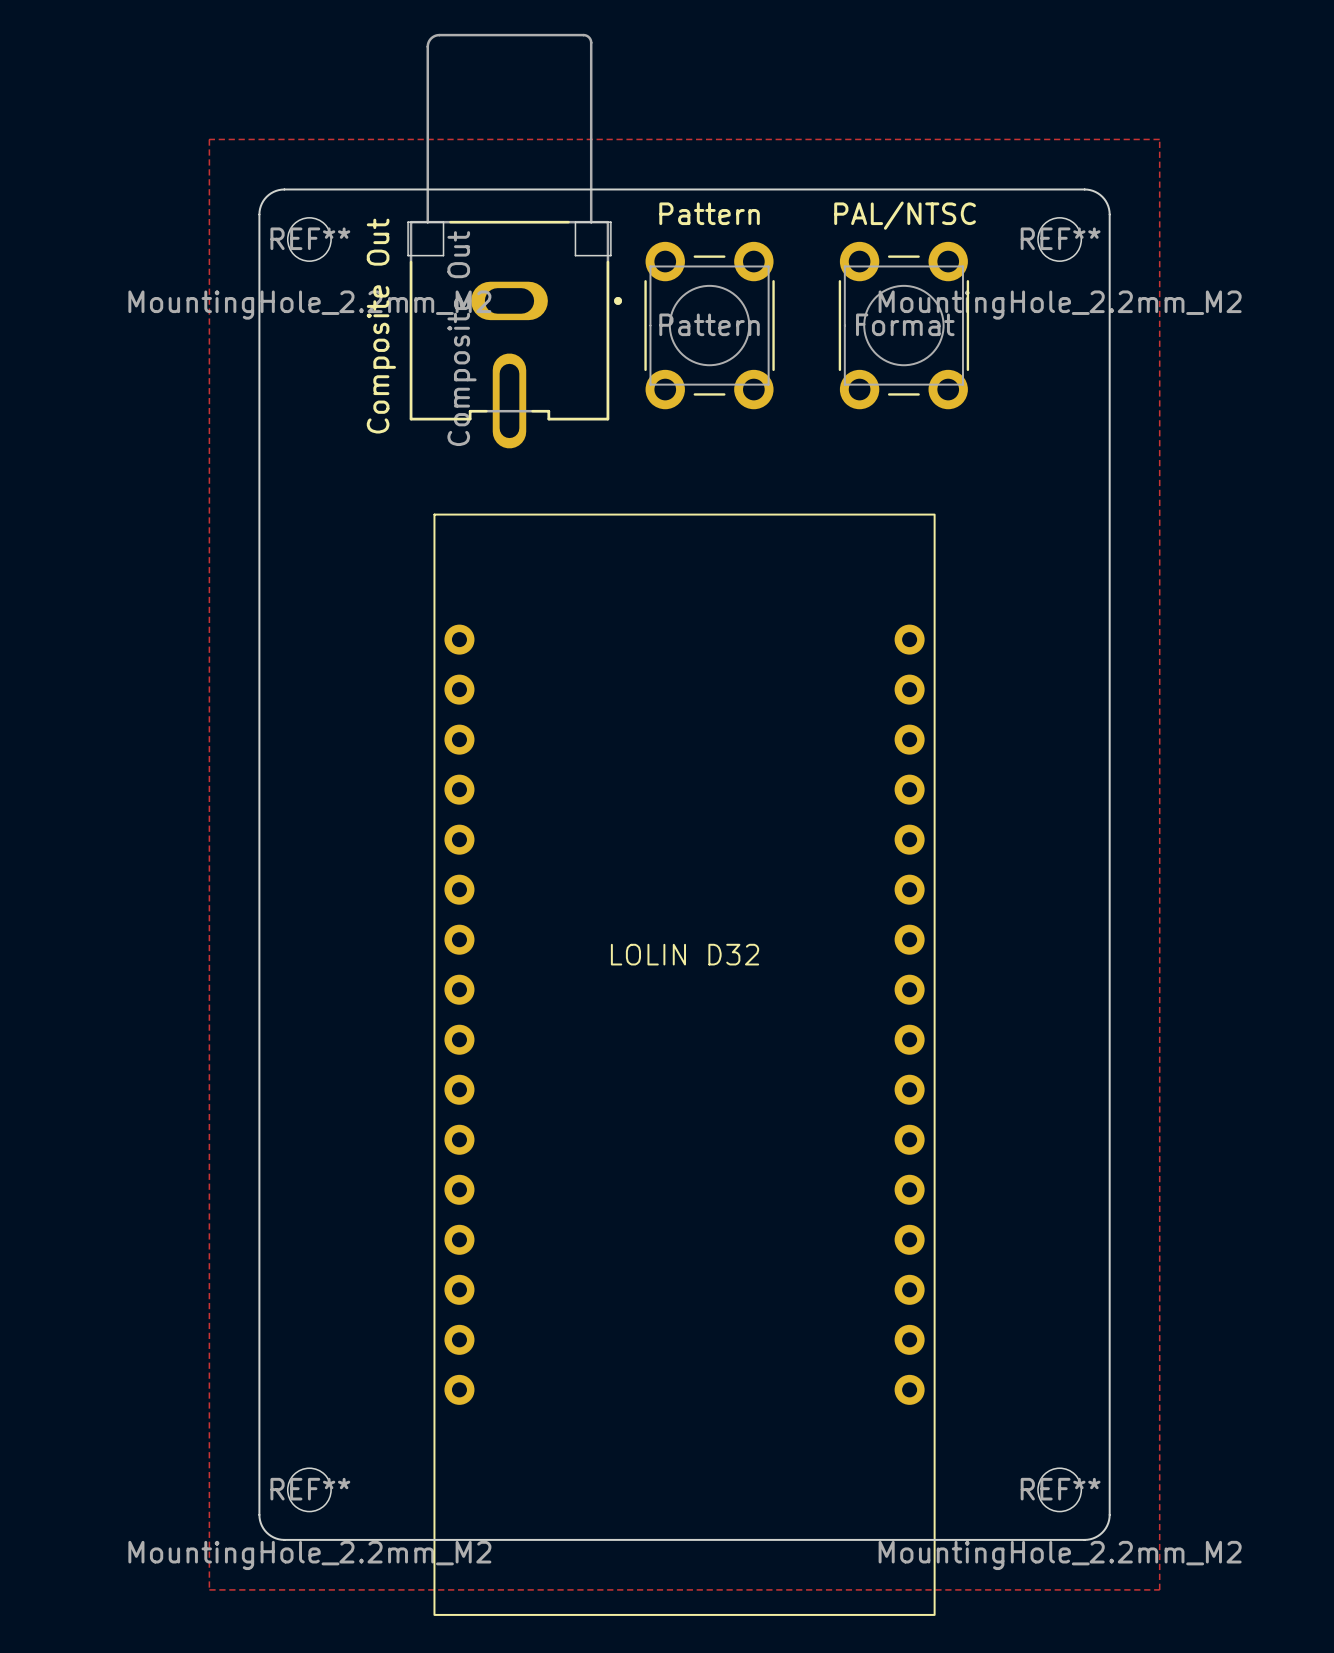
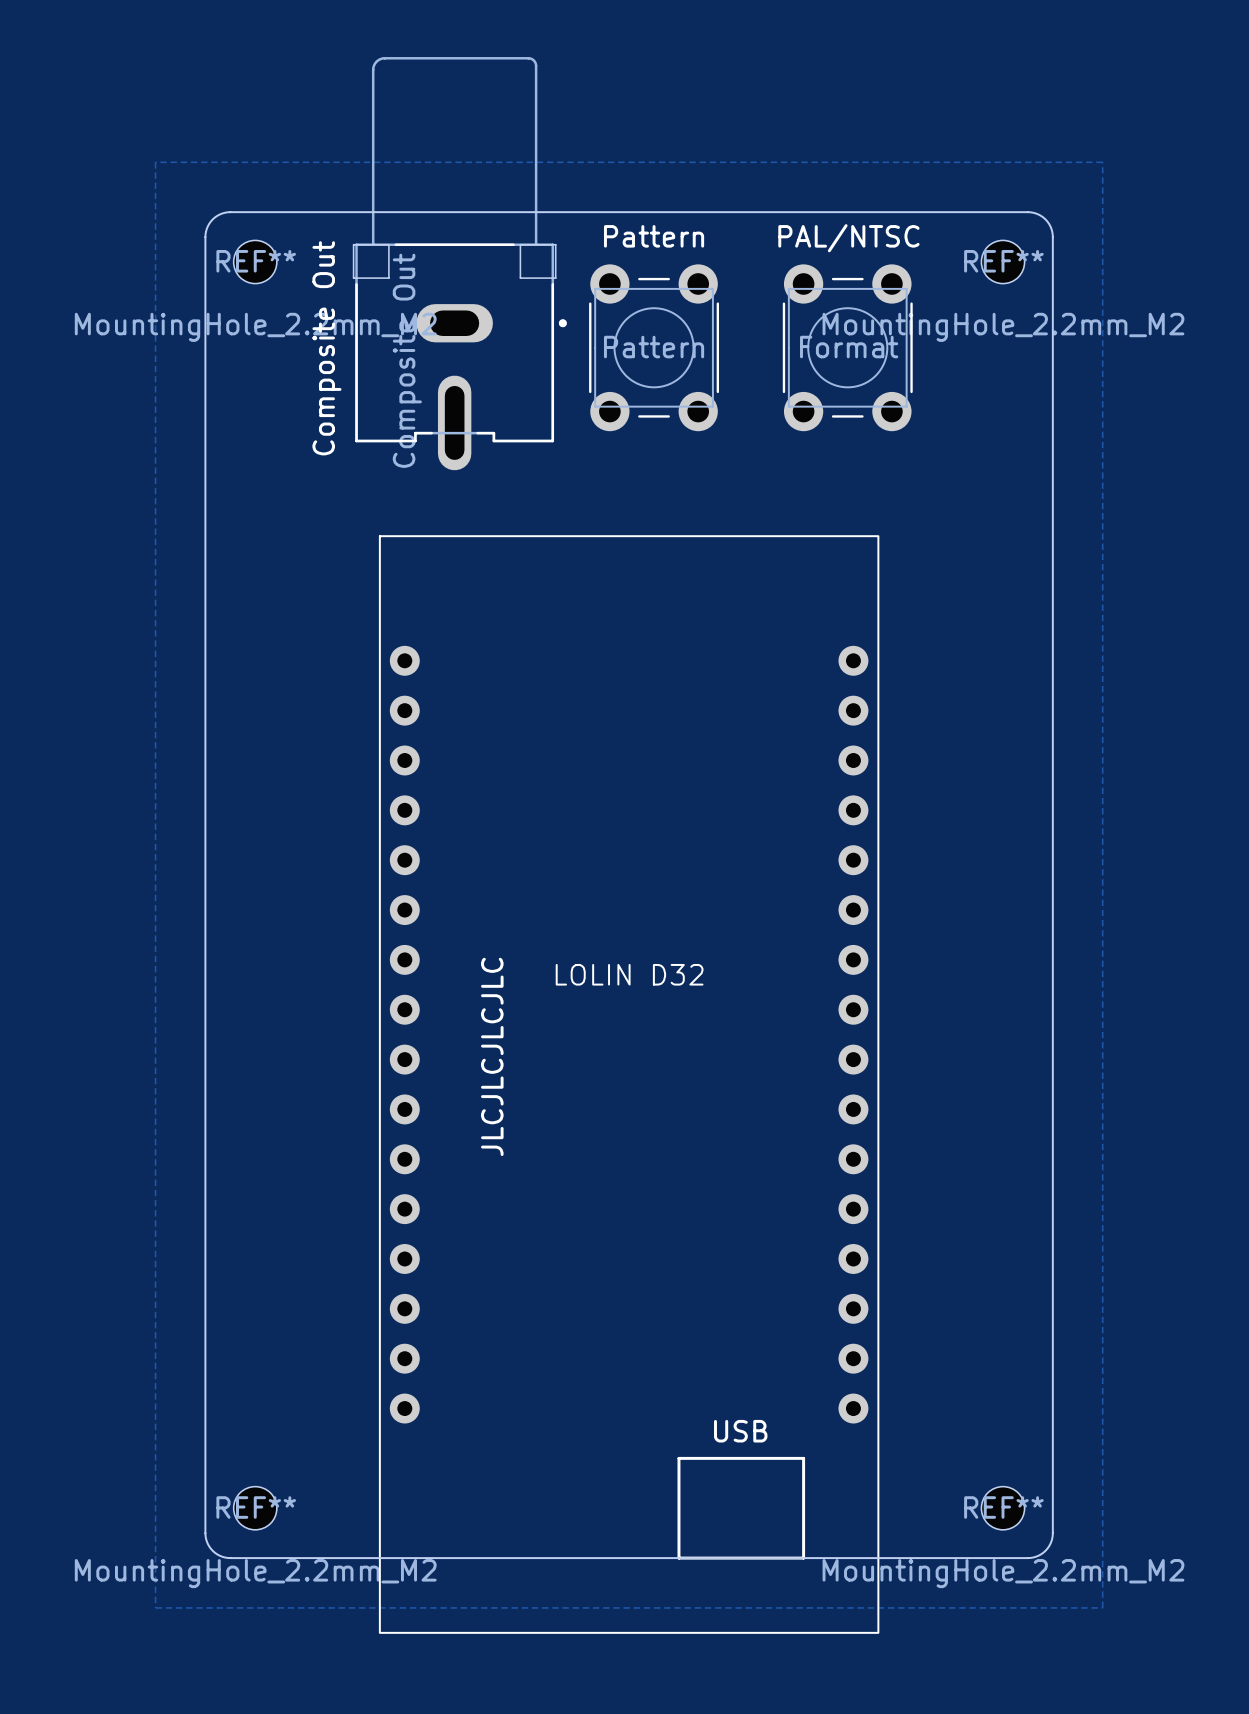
text: none -> JLCJLCJLCJLC (492, 1056)
text: none -> USB (740, 1431)
line: none -> (678, 1458) (803, 1458) (803, 1558) (678, 1558) (678, 1458)

